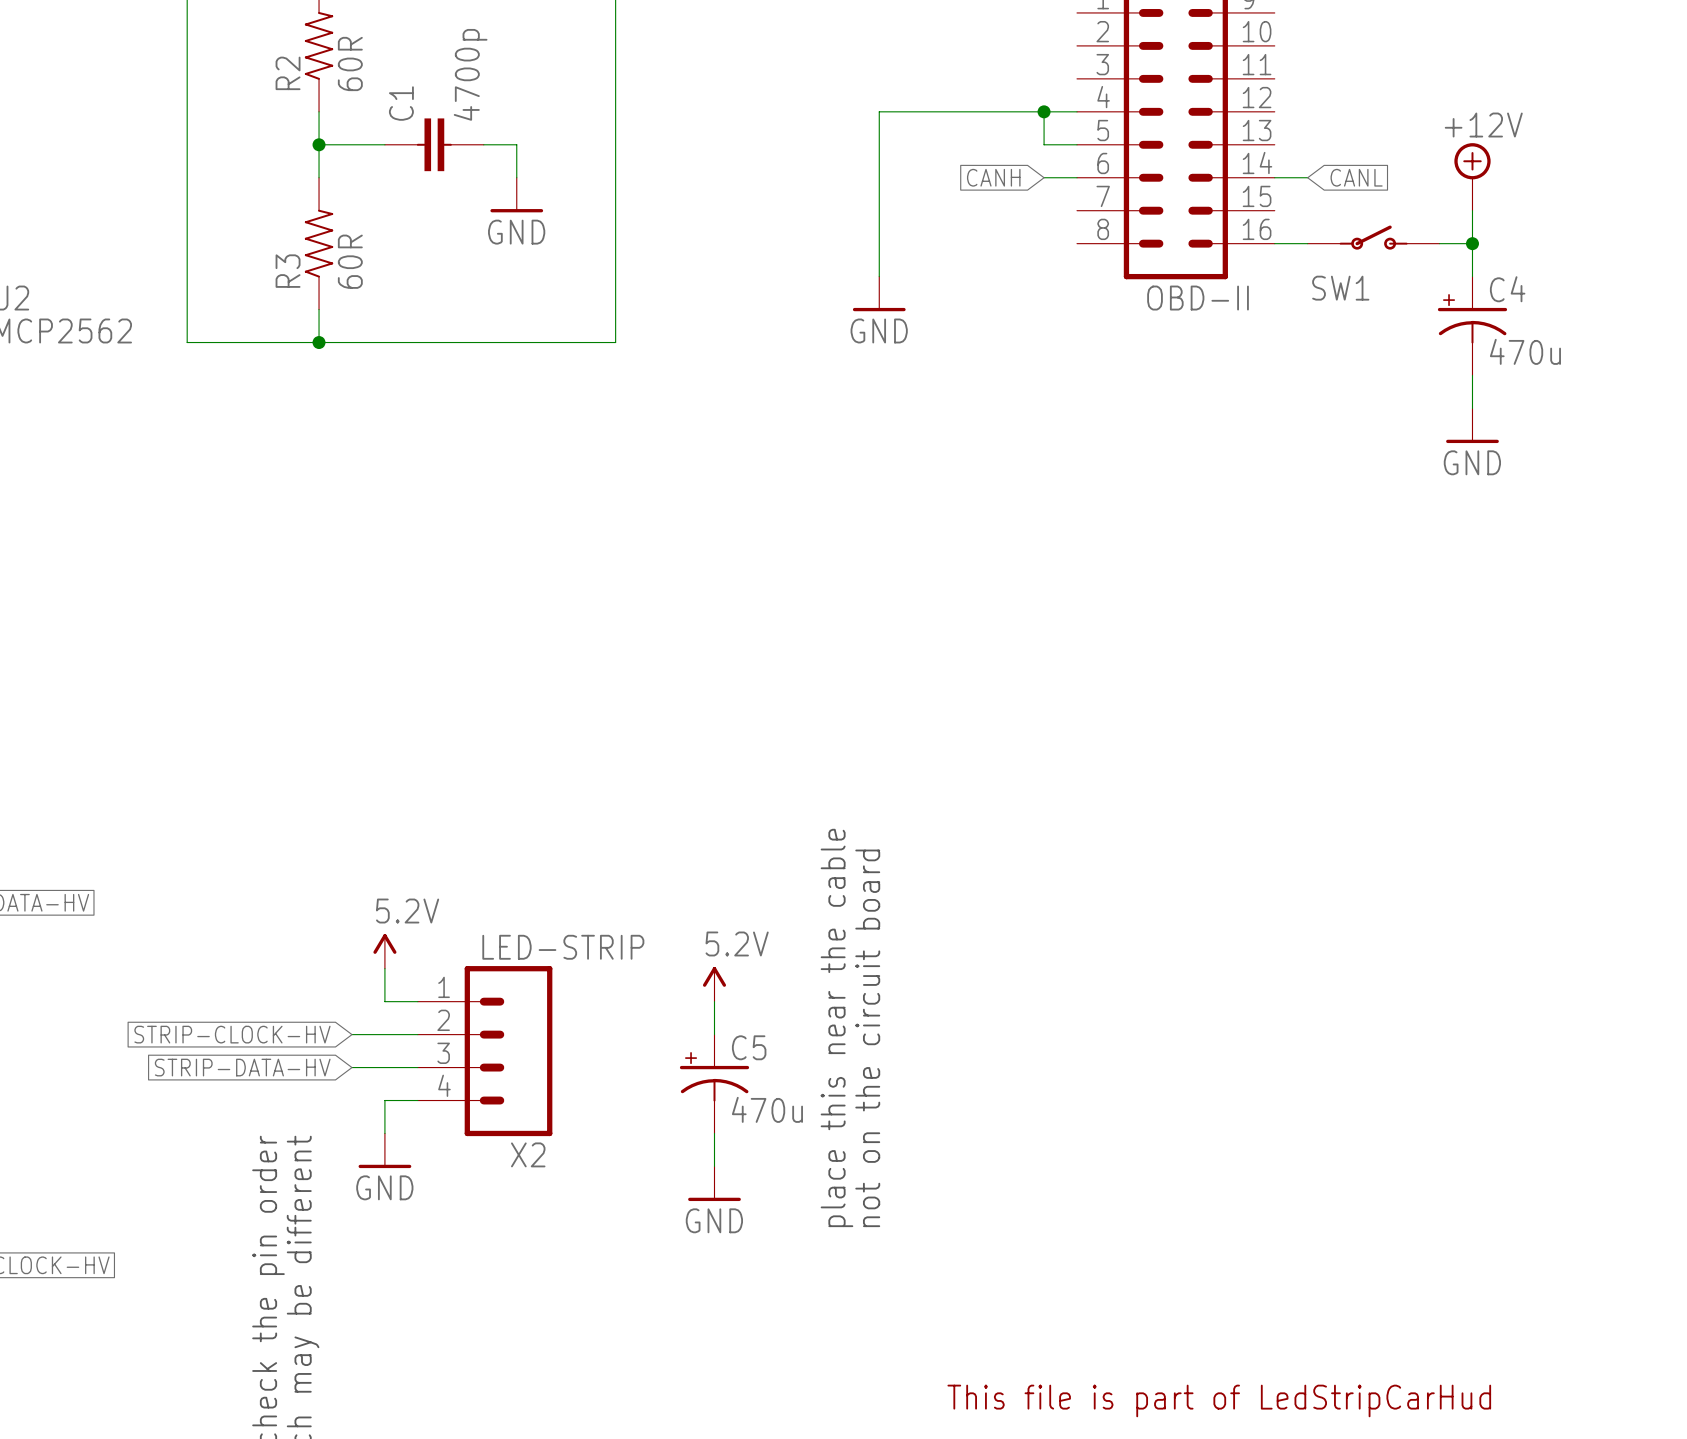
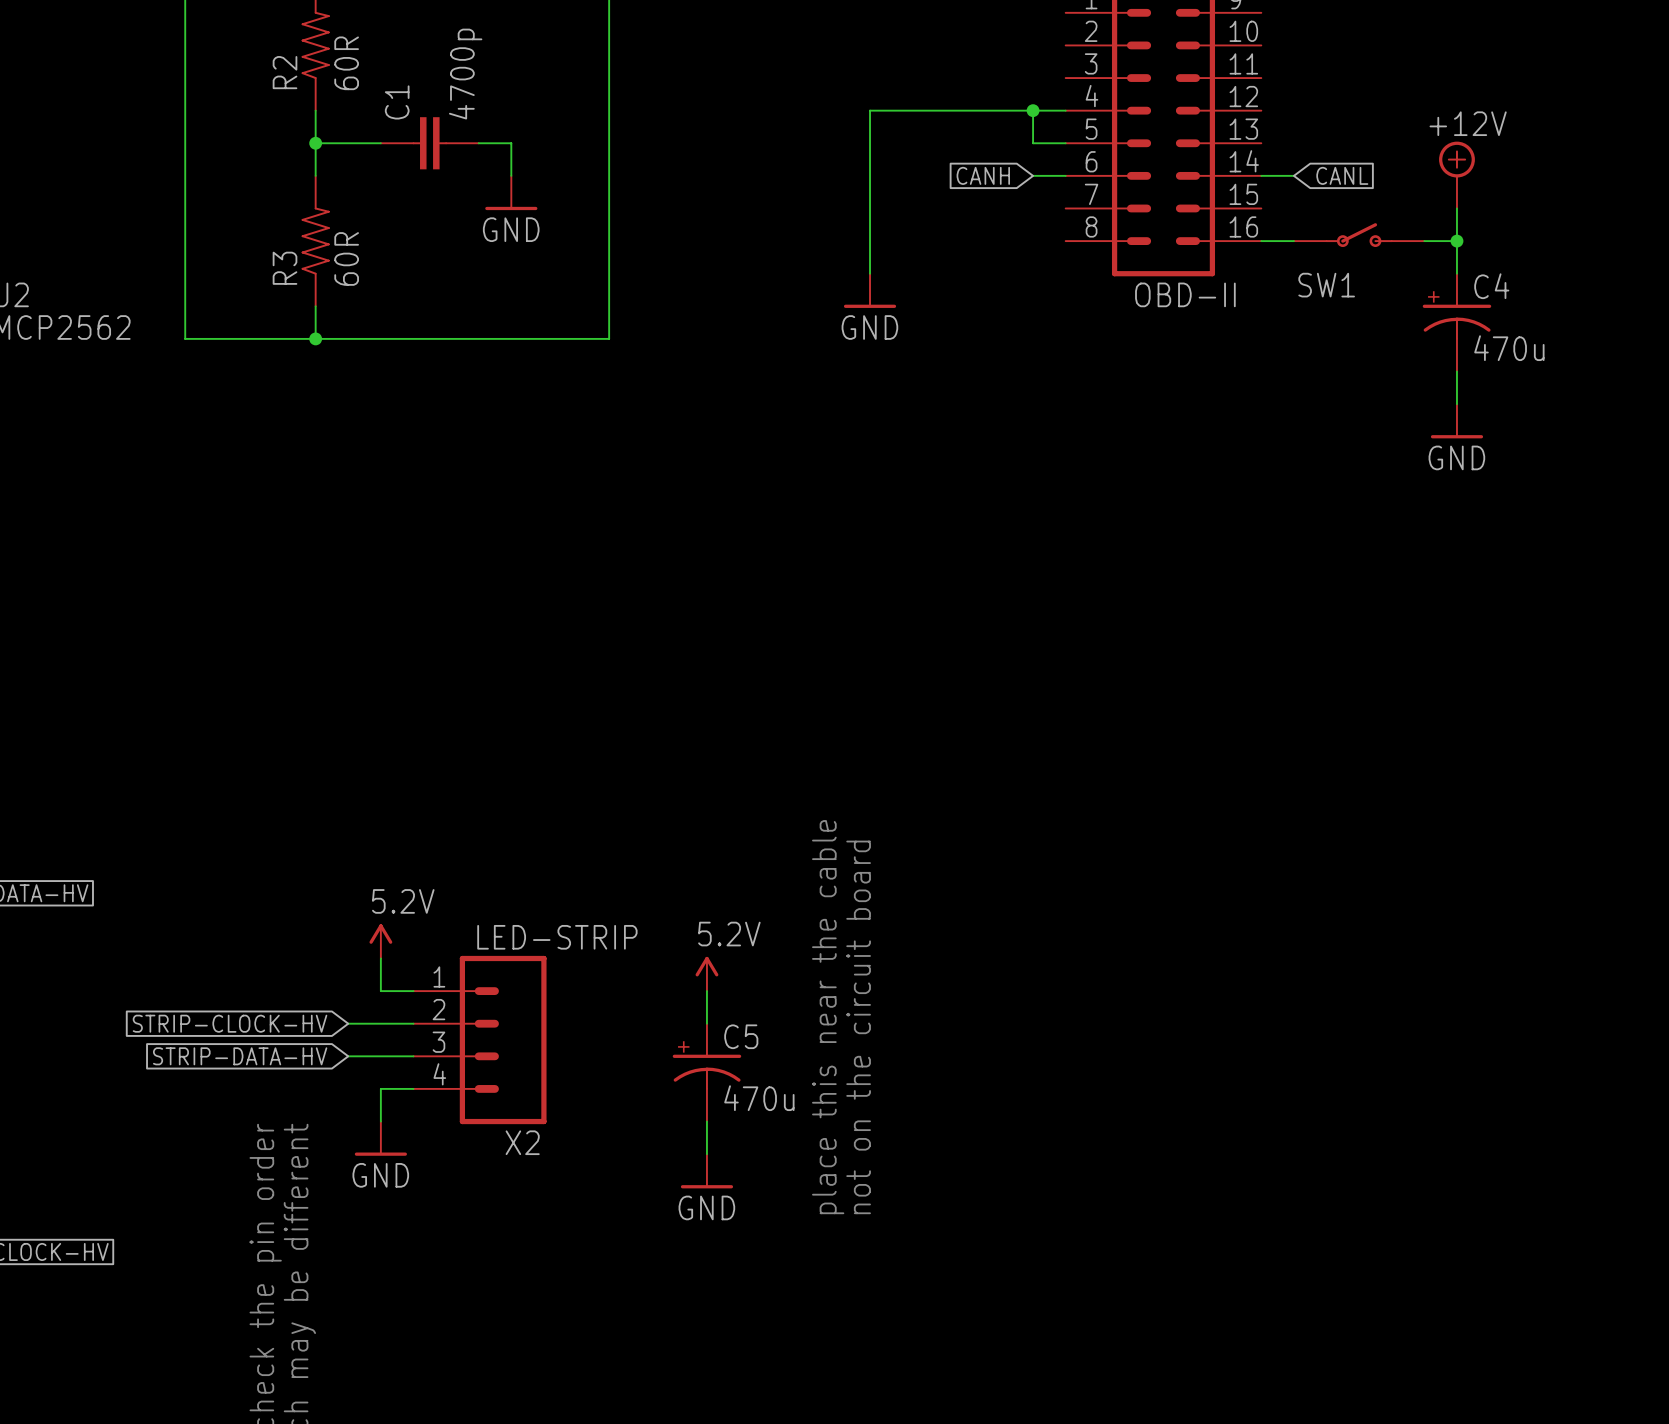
text: This file is part of LedStripCarHud (1219, 1400) -> none

